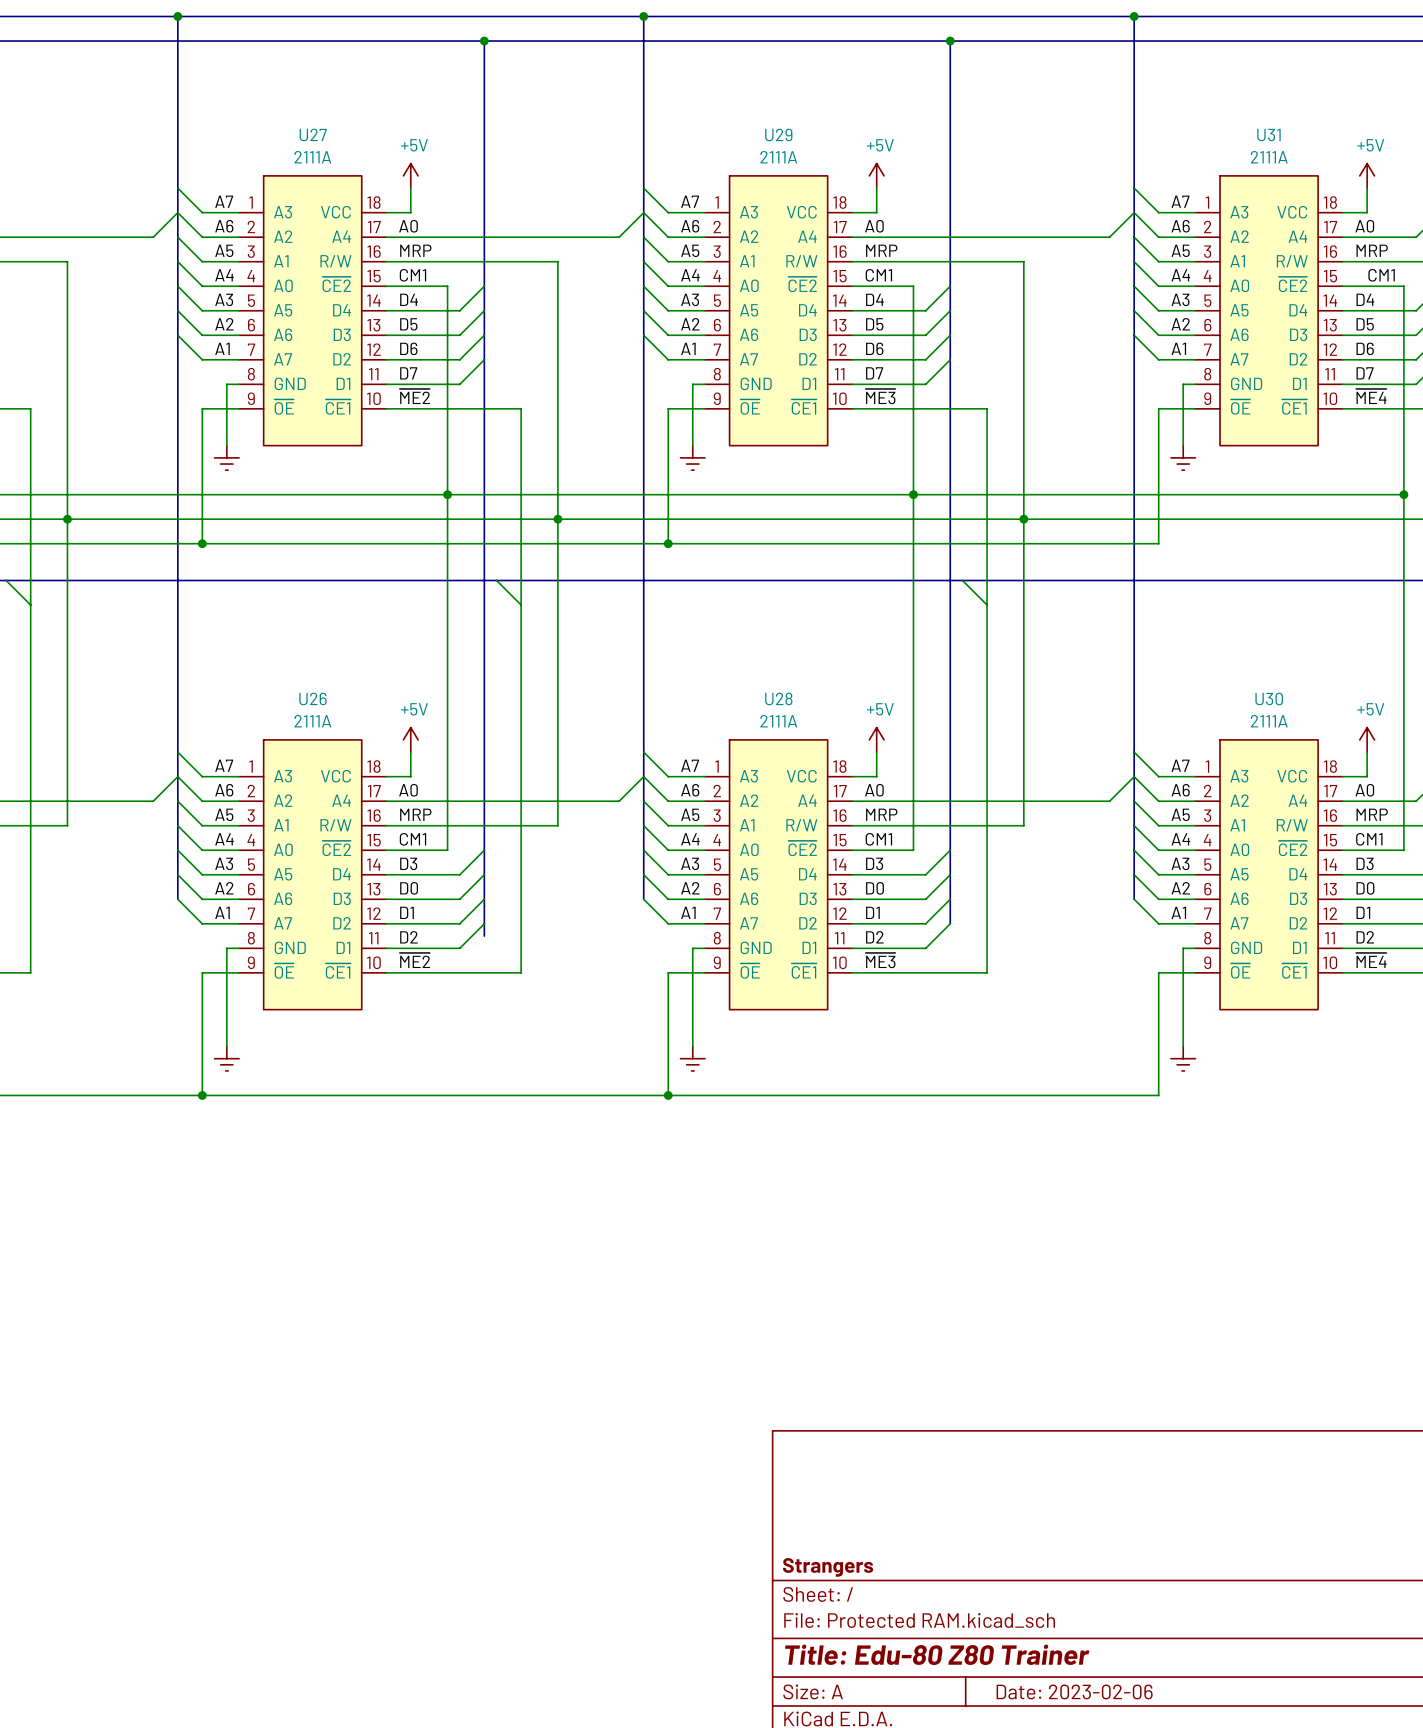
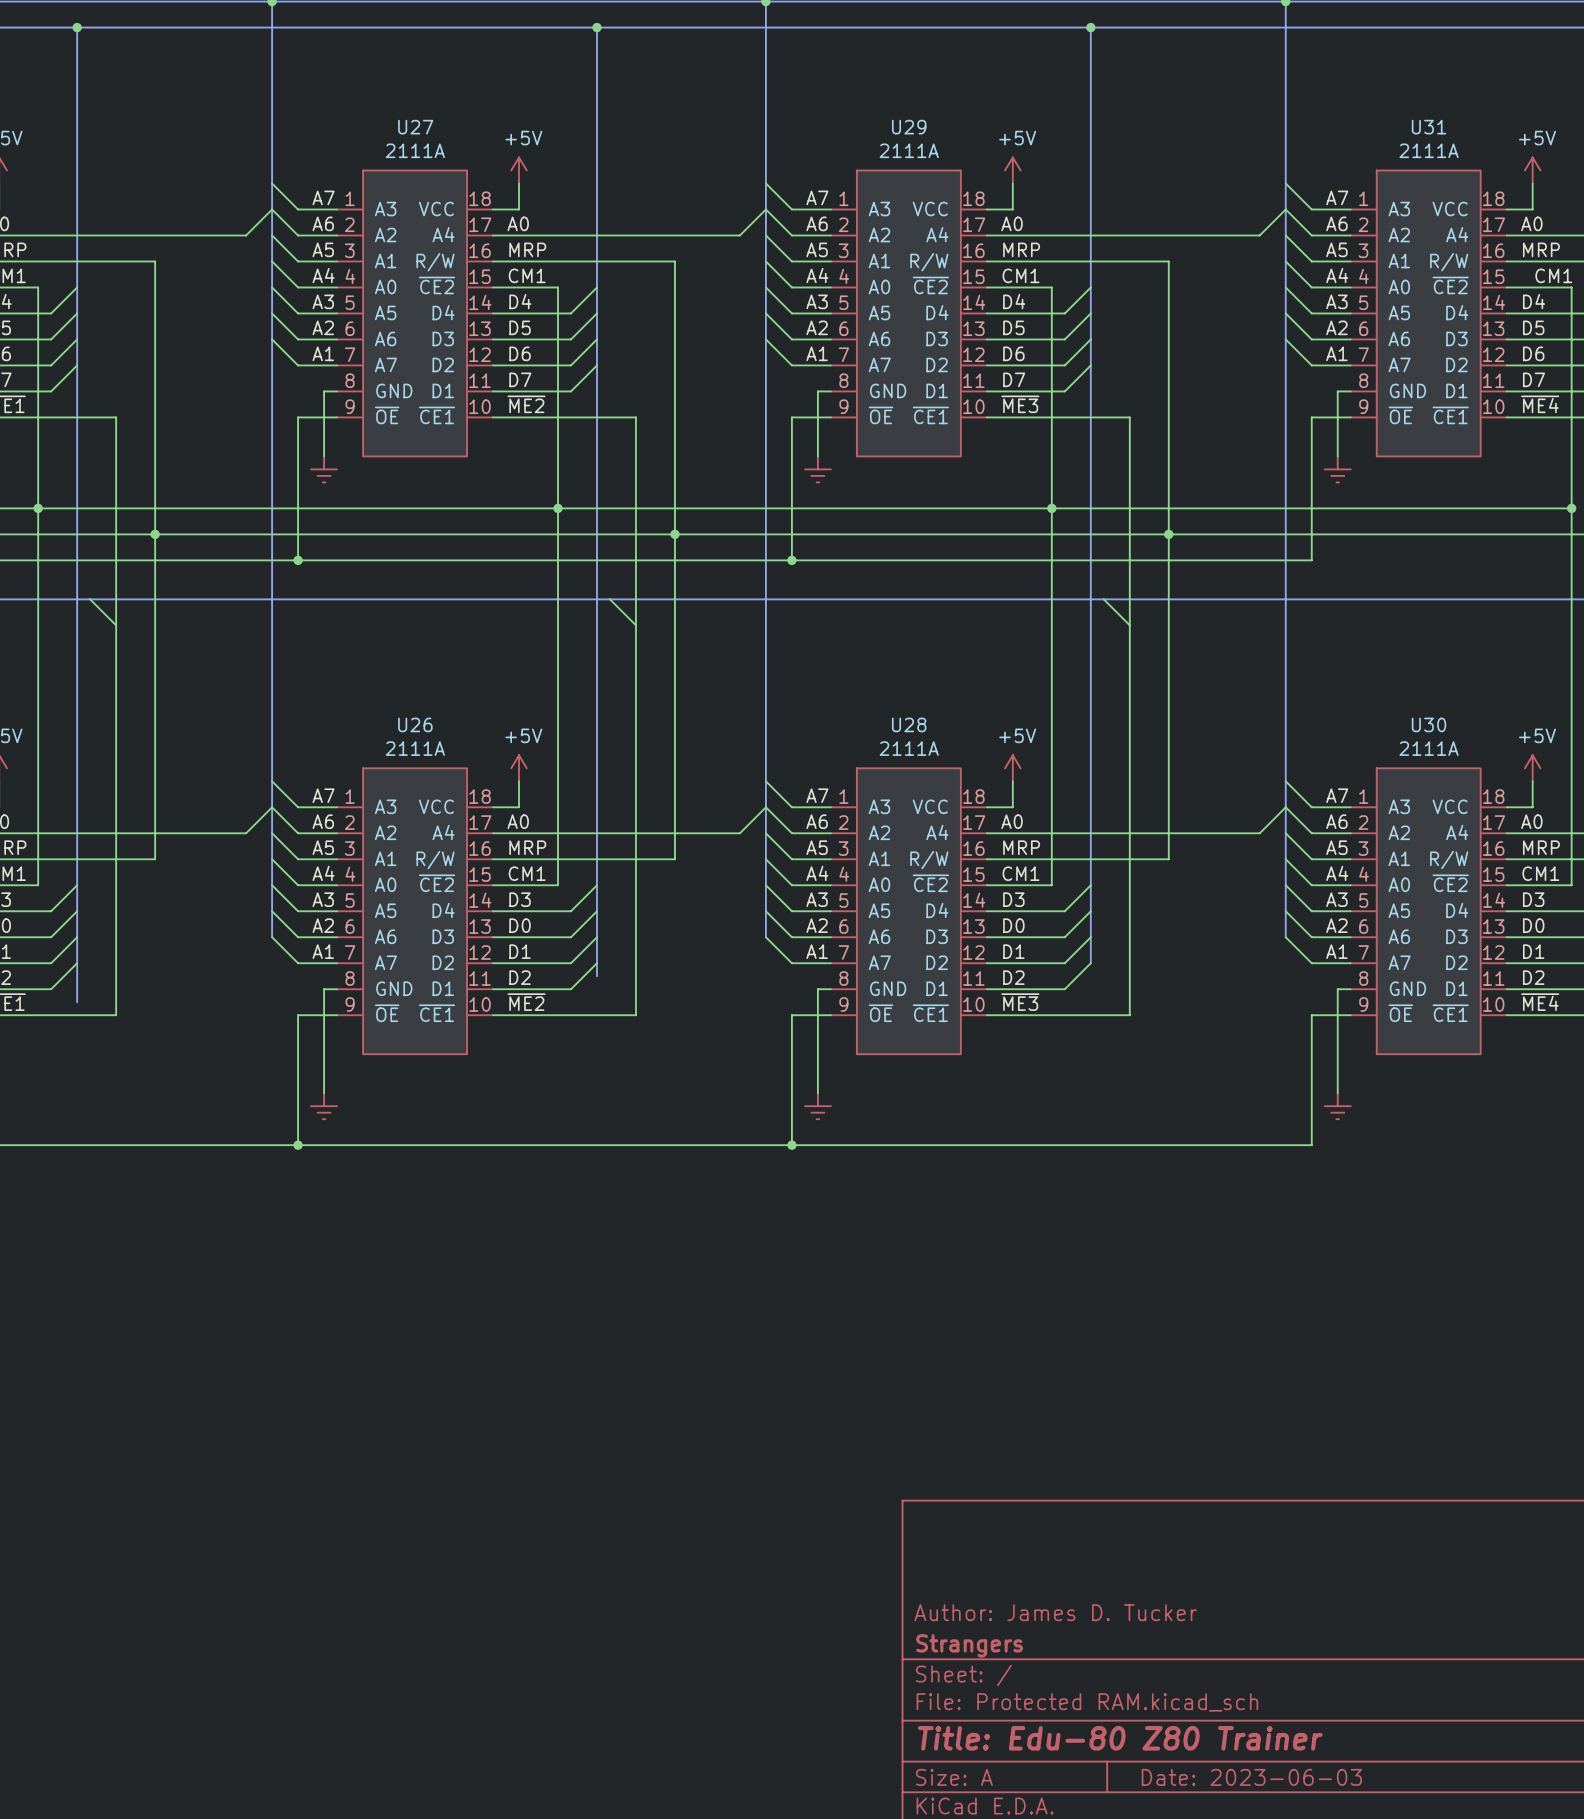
title block: none -> Author: James D. Tucker (1055, 1612)
title block: Date: 2023-02-06 (1074, 1691) -> Date: 2023-06-03 (1251, 1777)

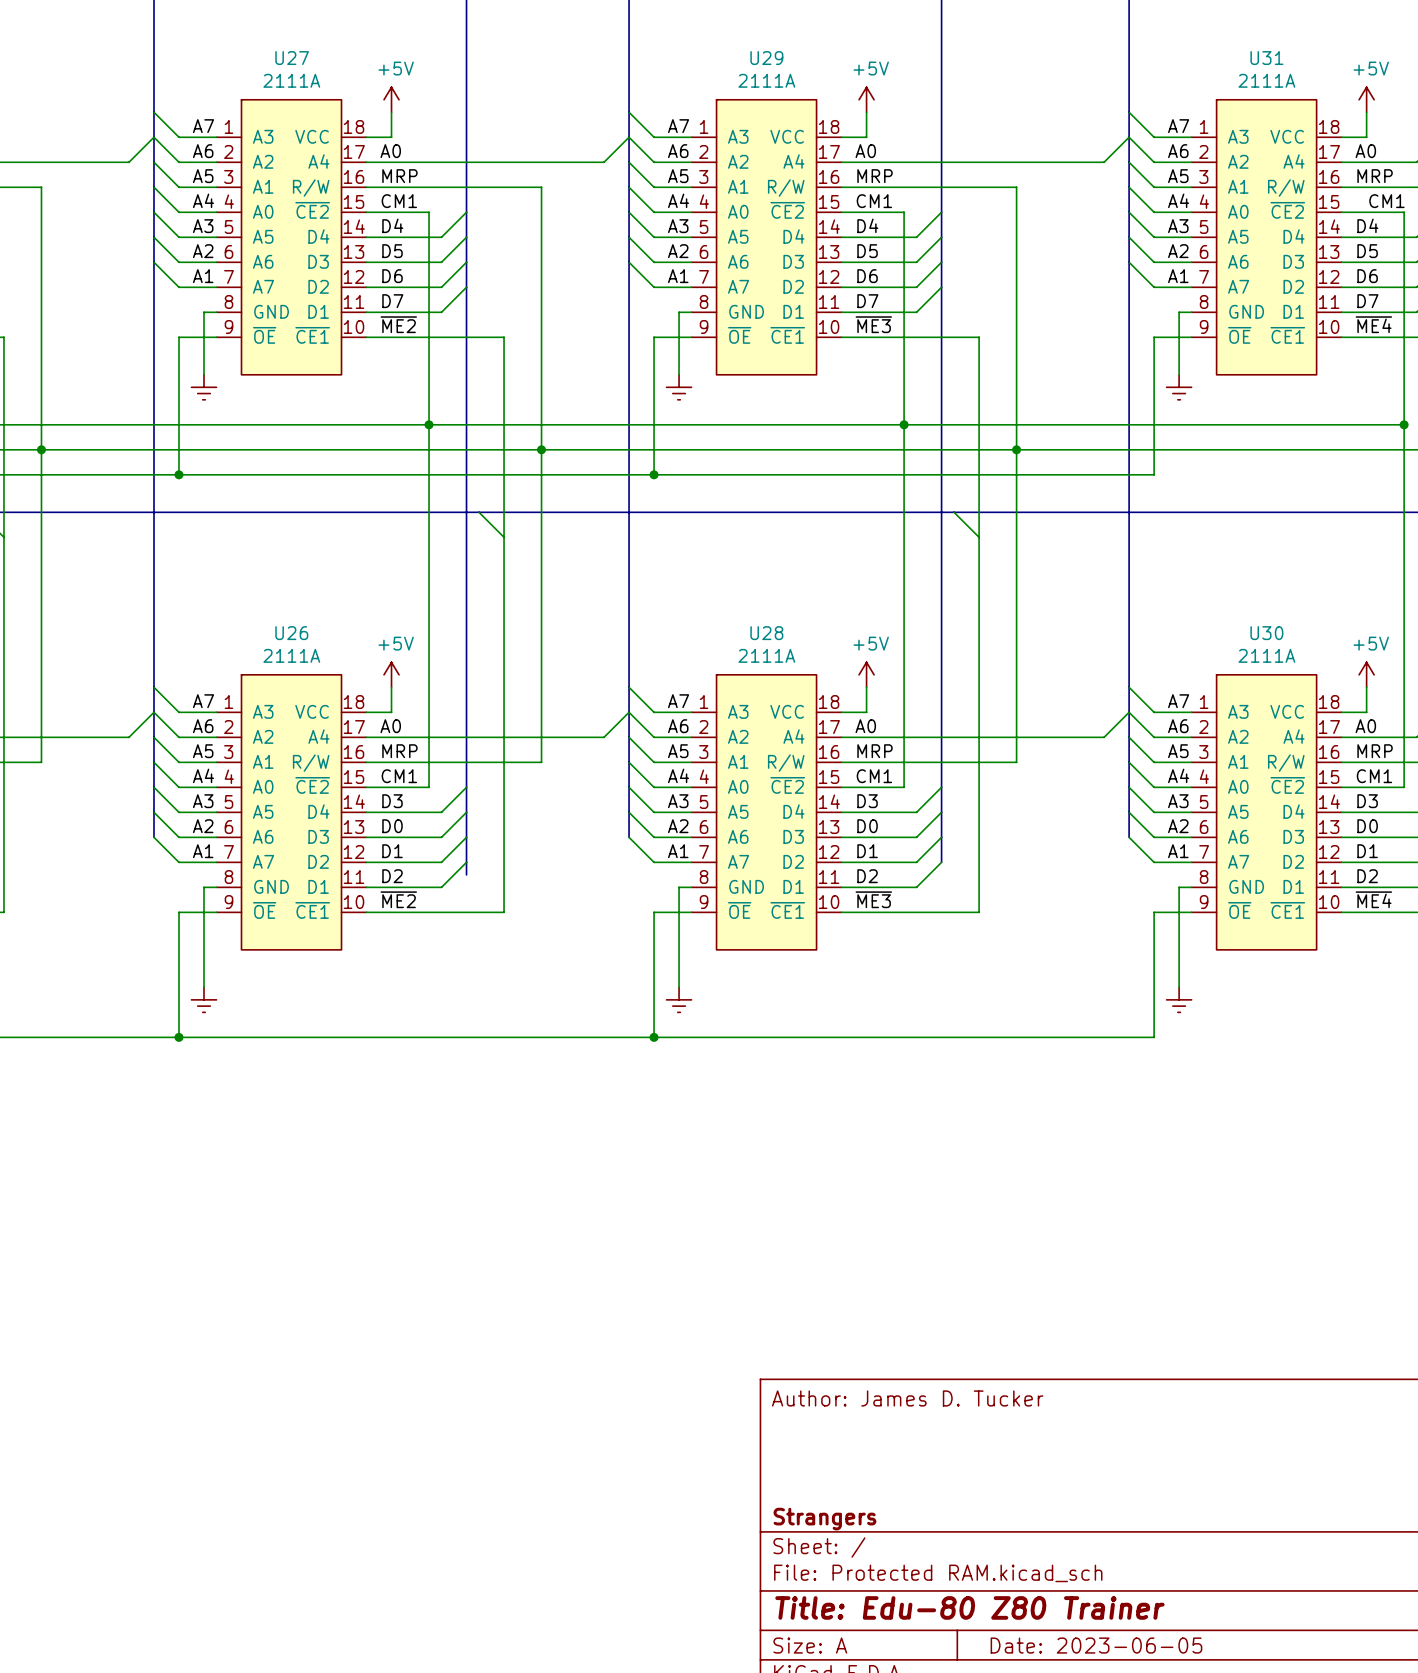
title block position: Author: James D. Tucker (1055, 1612) -> Author: James D. Tucker (907, 1398)
title block: Date: 2023-06-03 (1251, 1777) -> Date: 2023-06-05 (1096, 1645)

